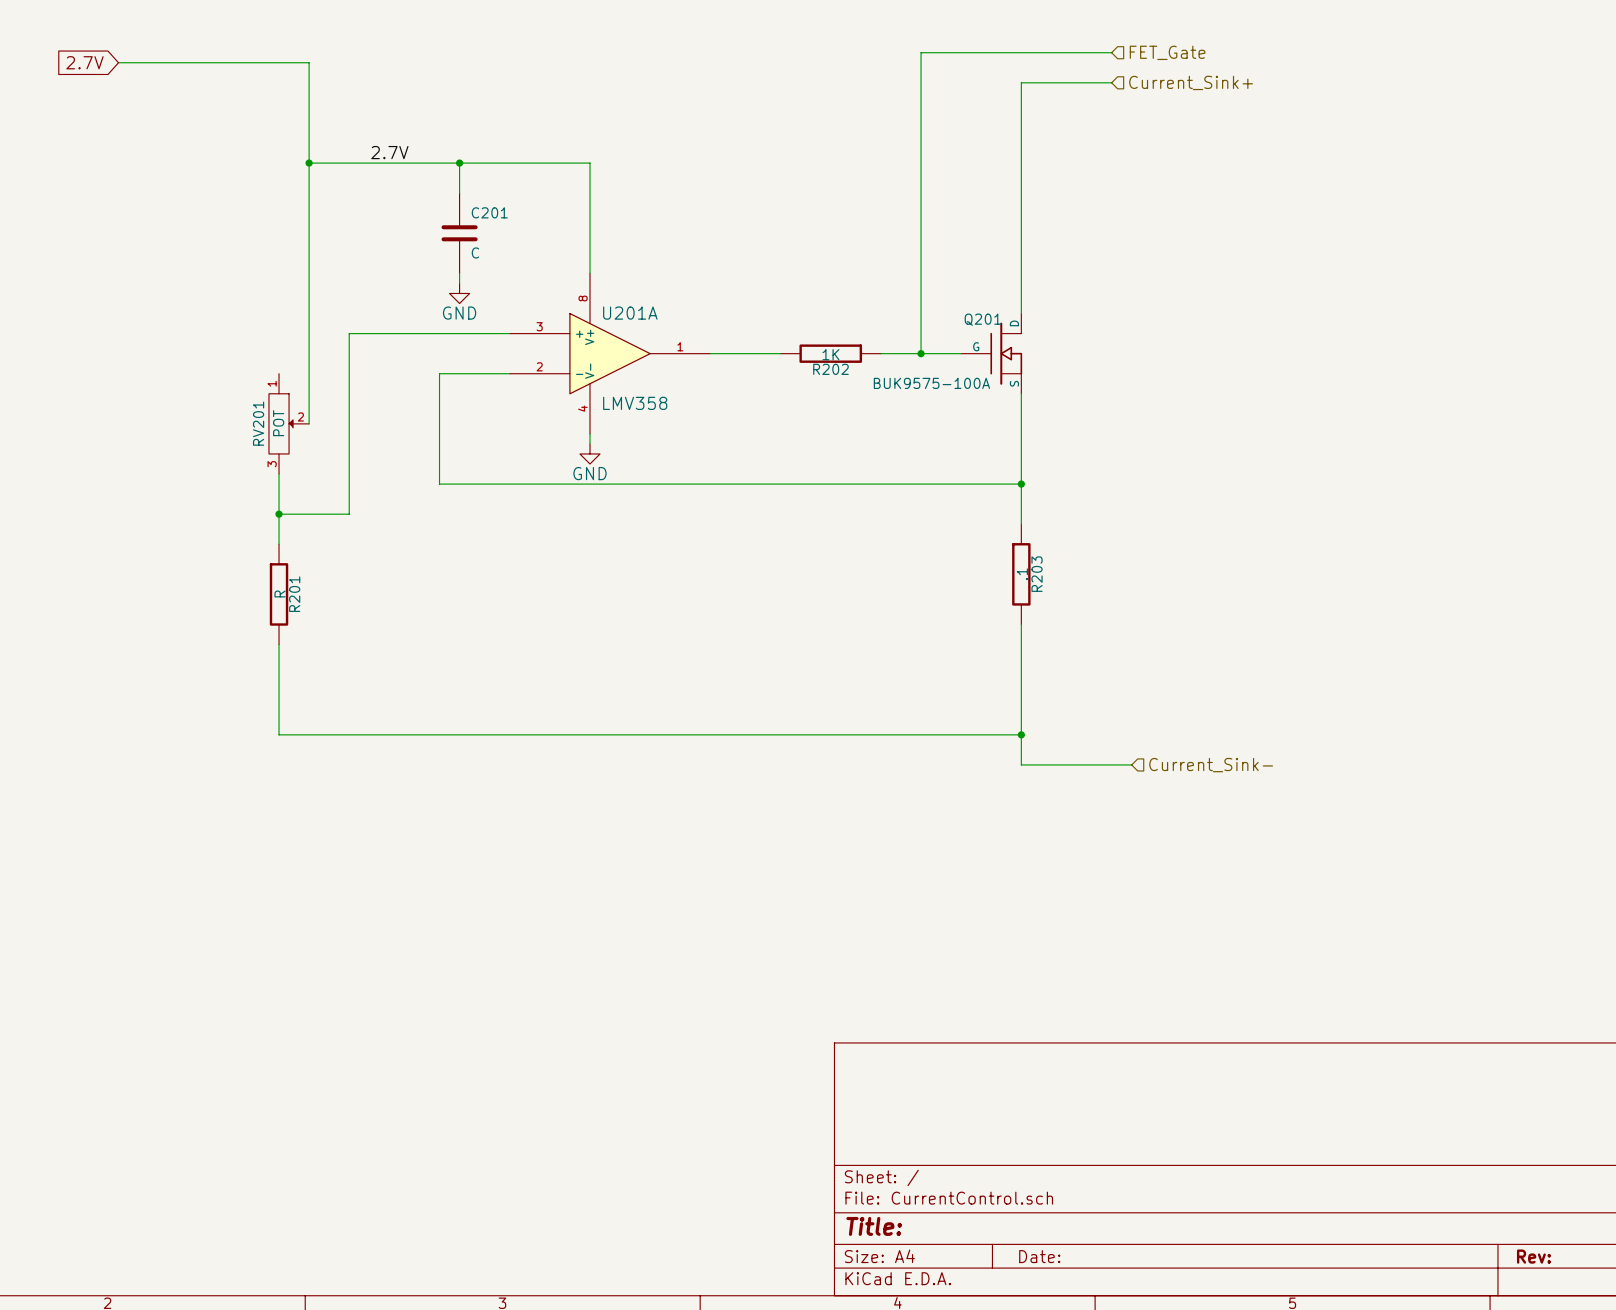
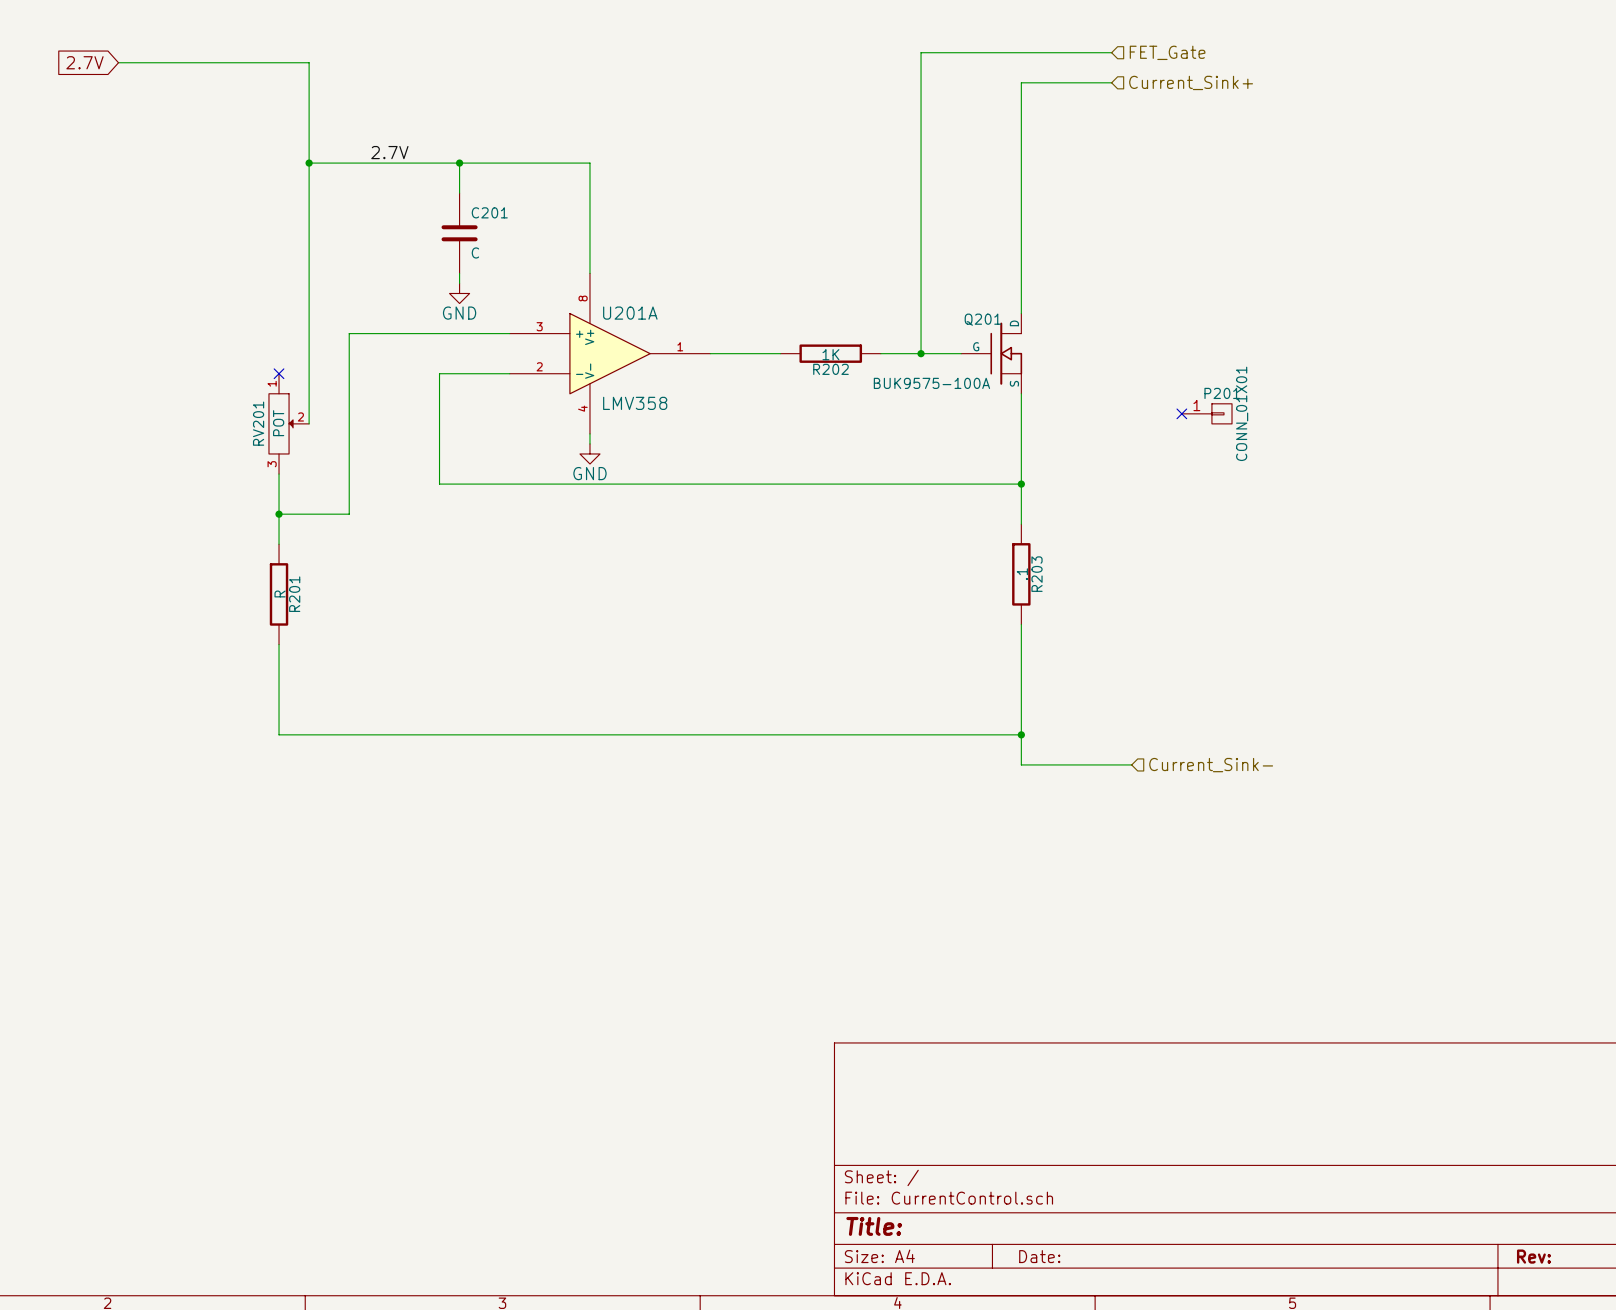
no-connect mark: none -> (279, 373)
no-connect mark: none -> (1181, 413)
P201: none -> CONN_01X01 (1206, 413)

